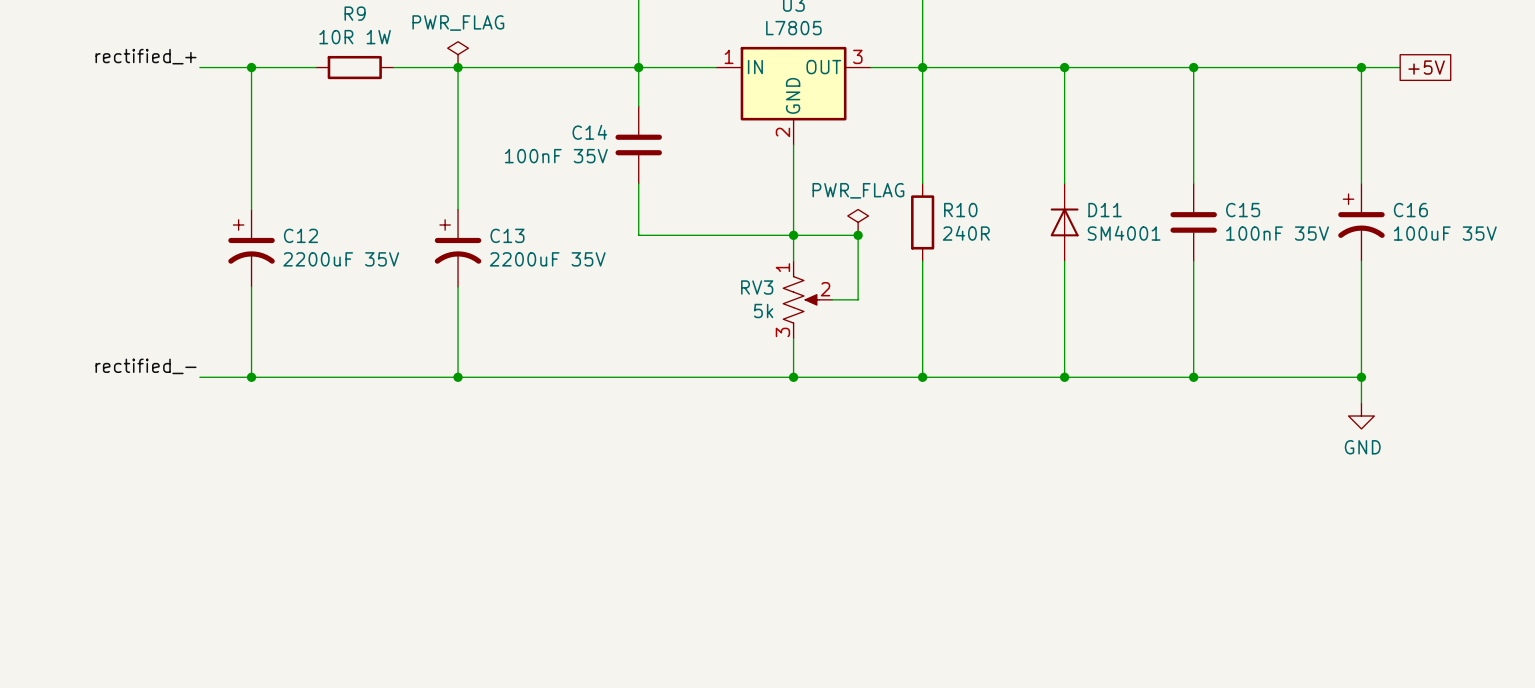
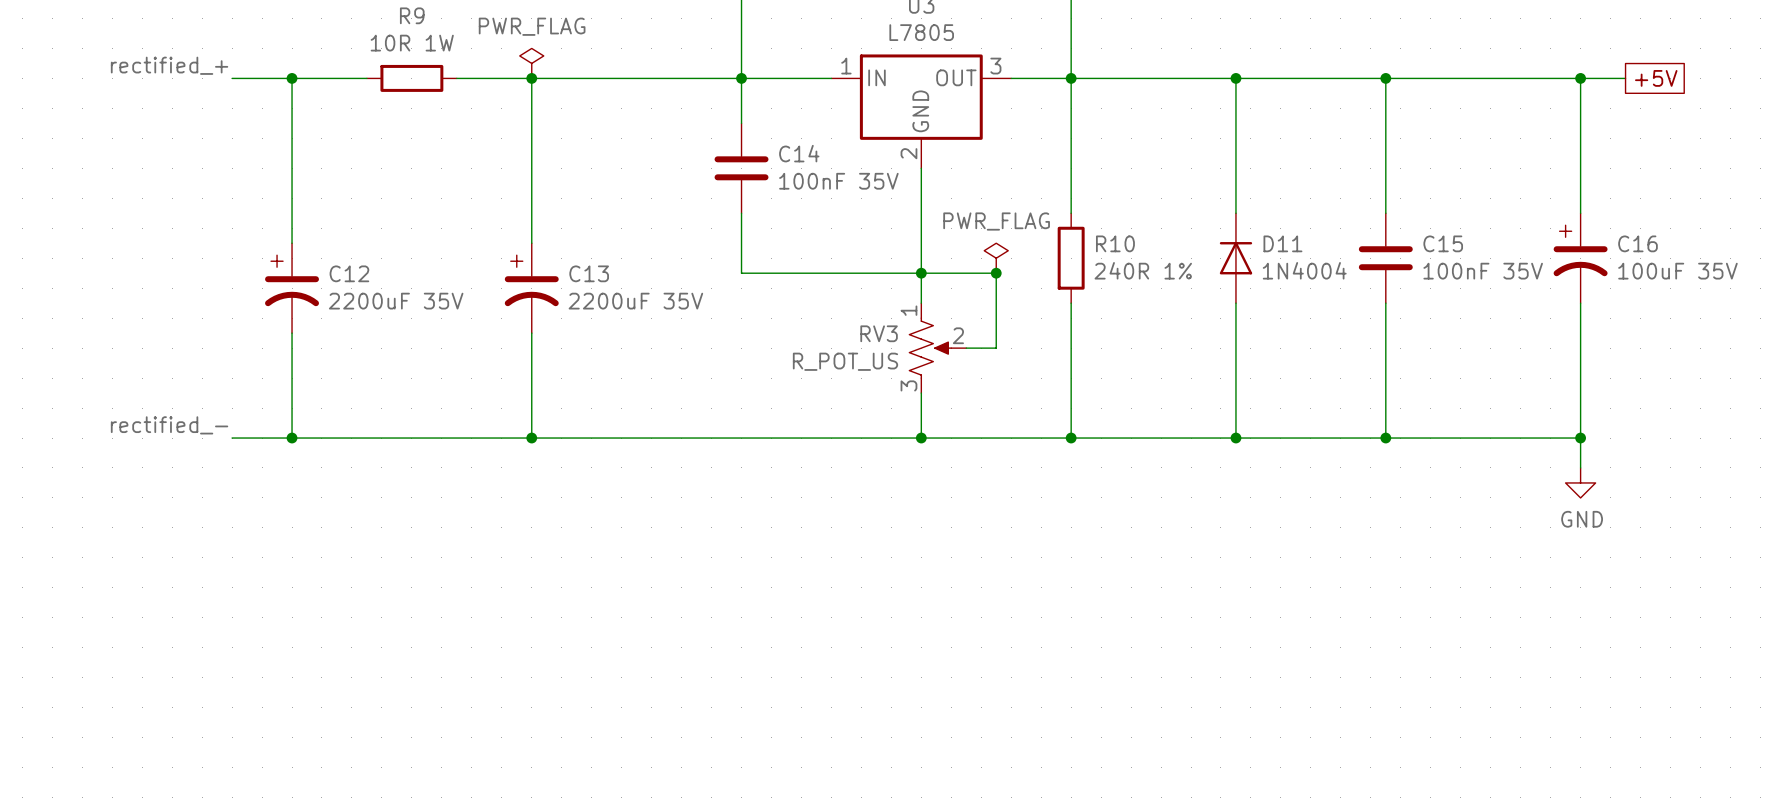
C14 name position: C14 (589, 132) -> C14 (799, 153)
C14 value position: 100nF 35V (556, 156) -> 100nF 35V (838, 181)
R10 value: 240R (966, 233) -> 240R 1% (1143, 270)
D11 value: SM4001 (1124, 233) -> 1N4004 (1304, 270)
RV3 value: 5k (763, 310) -> R_POT_US (845, 361)

